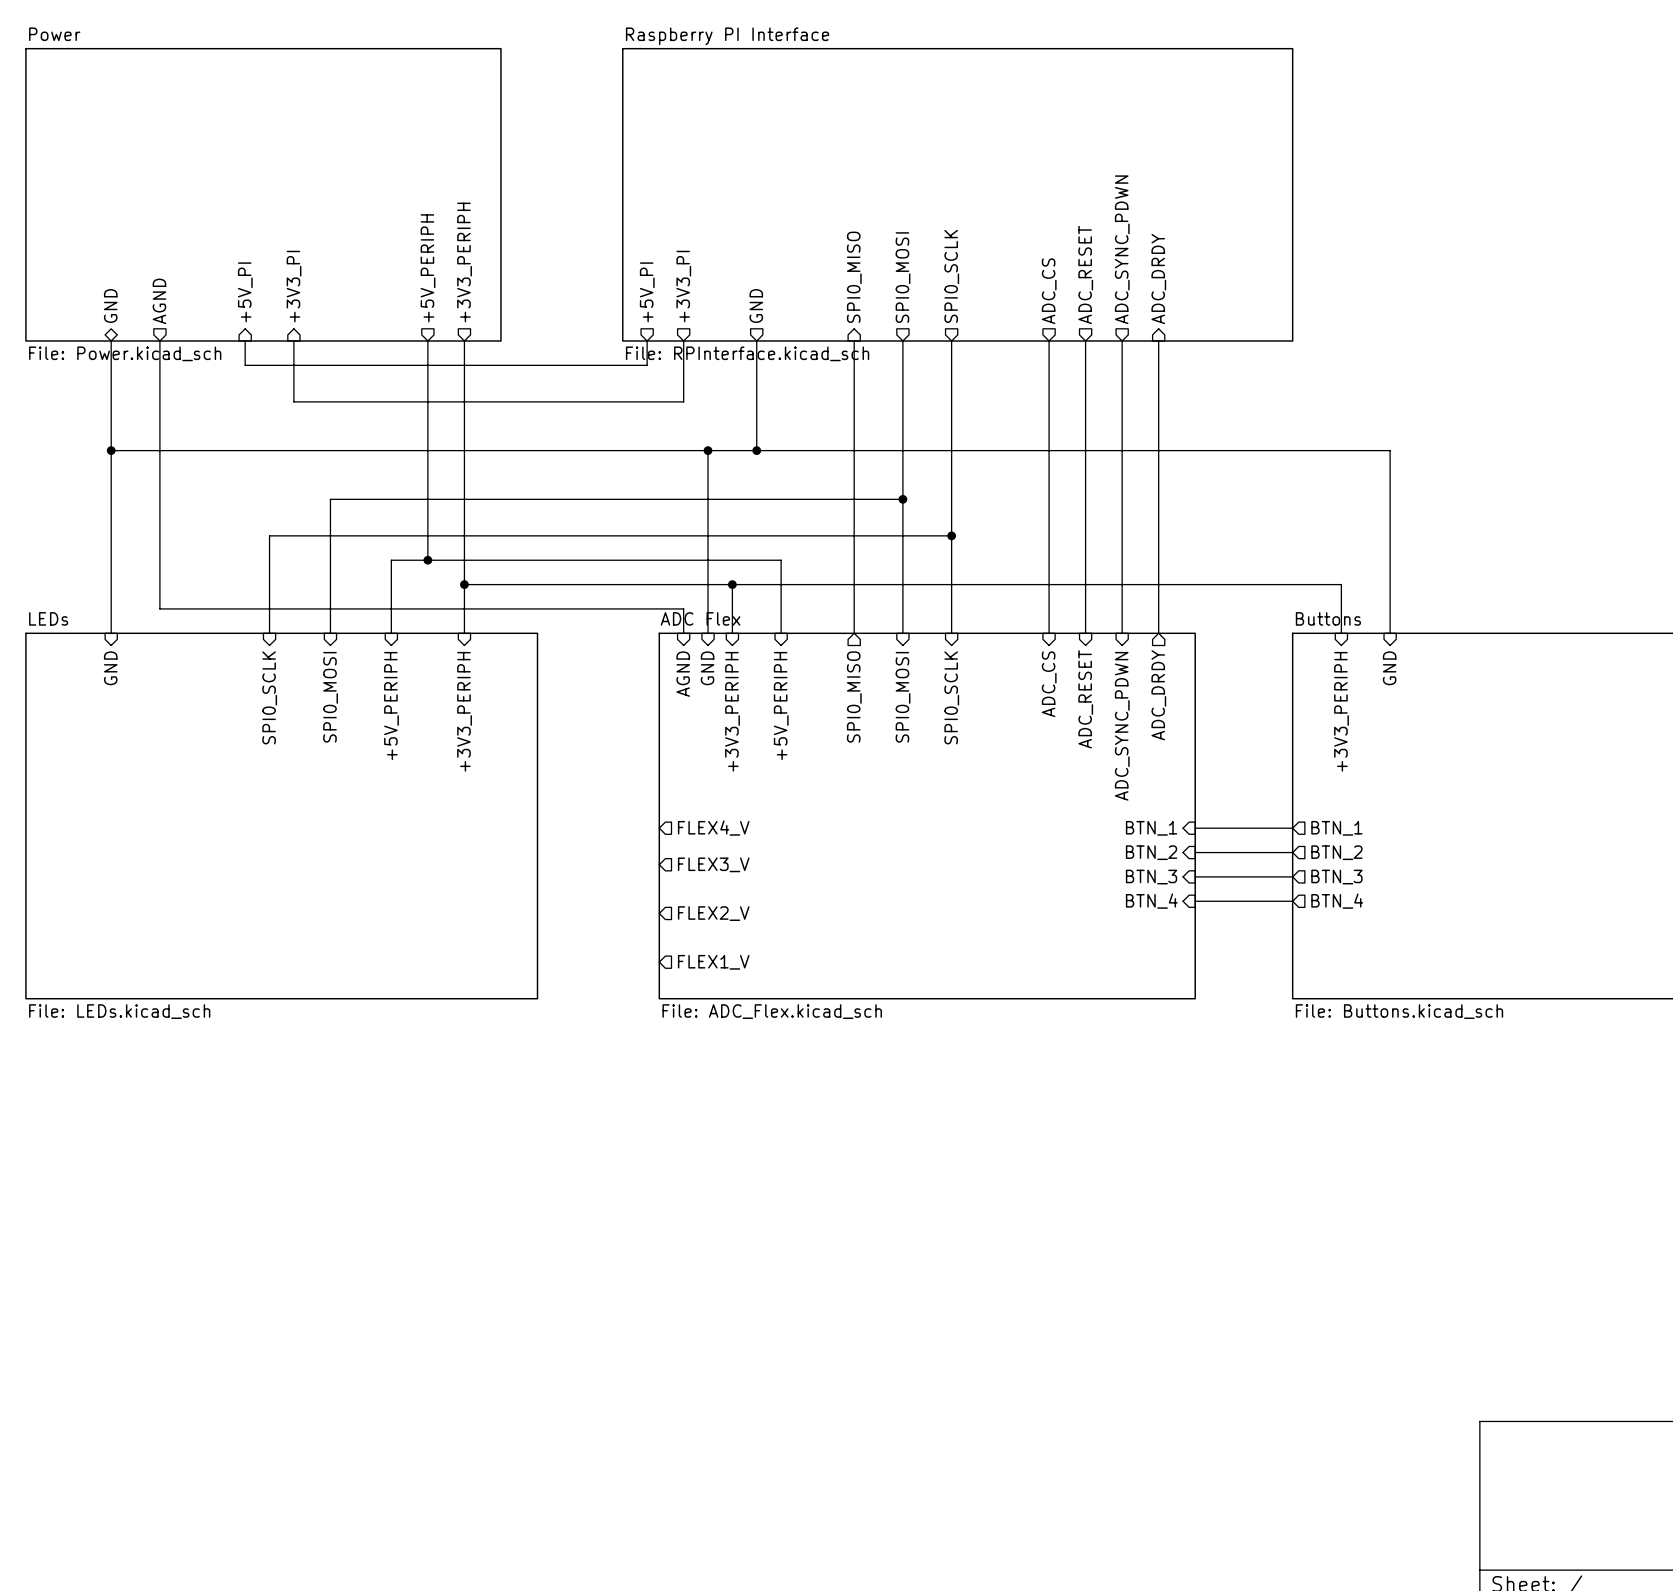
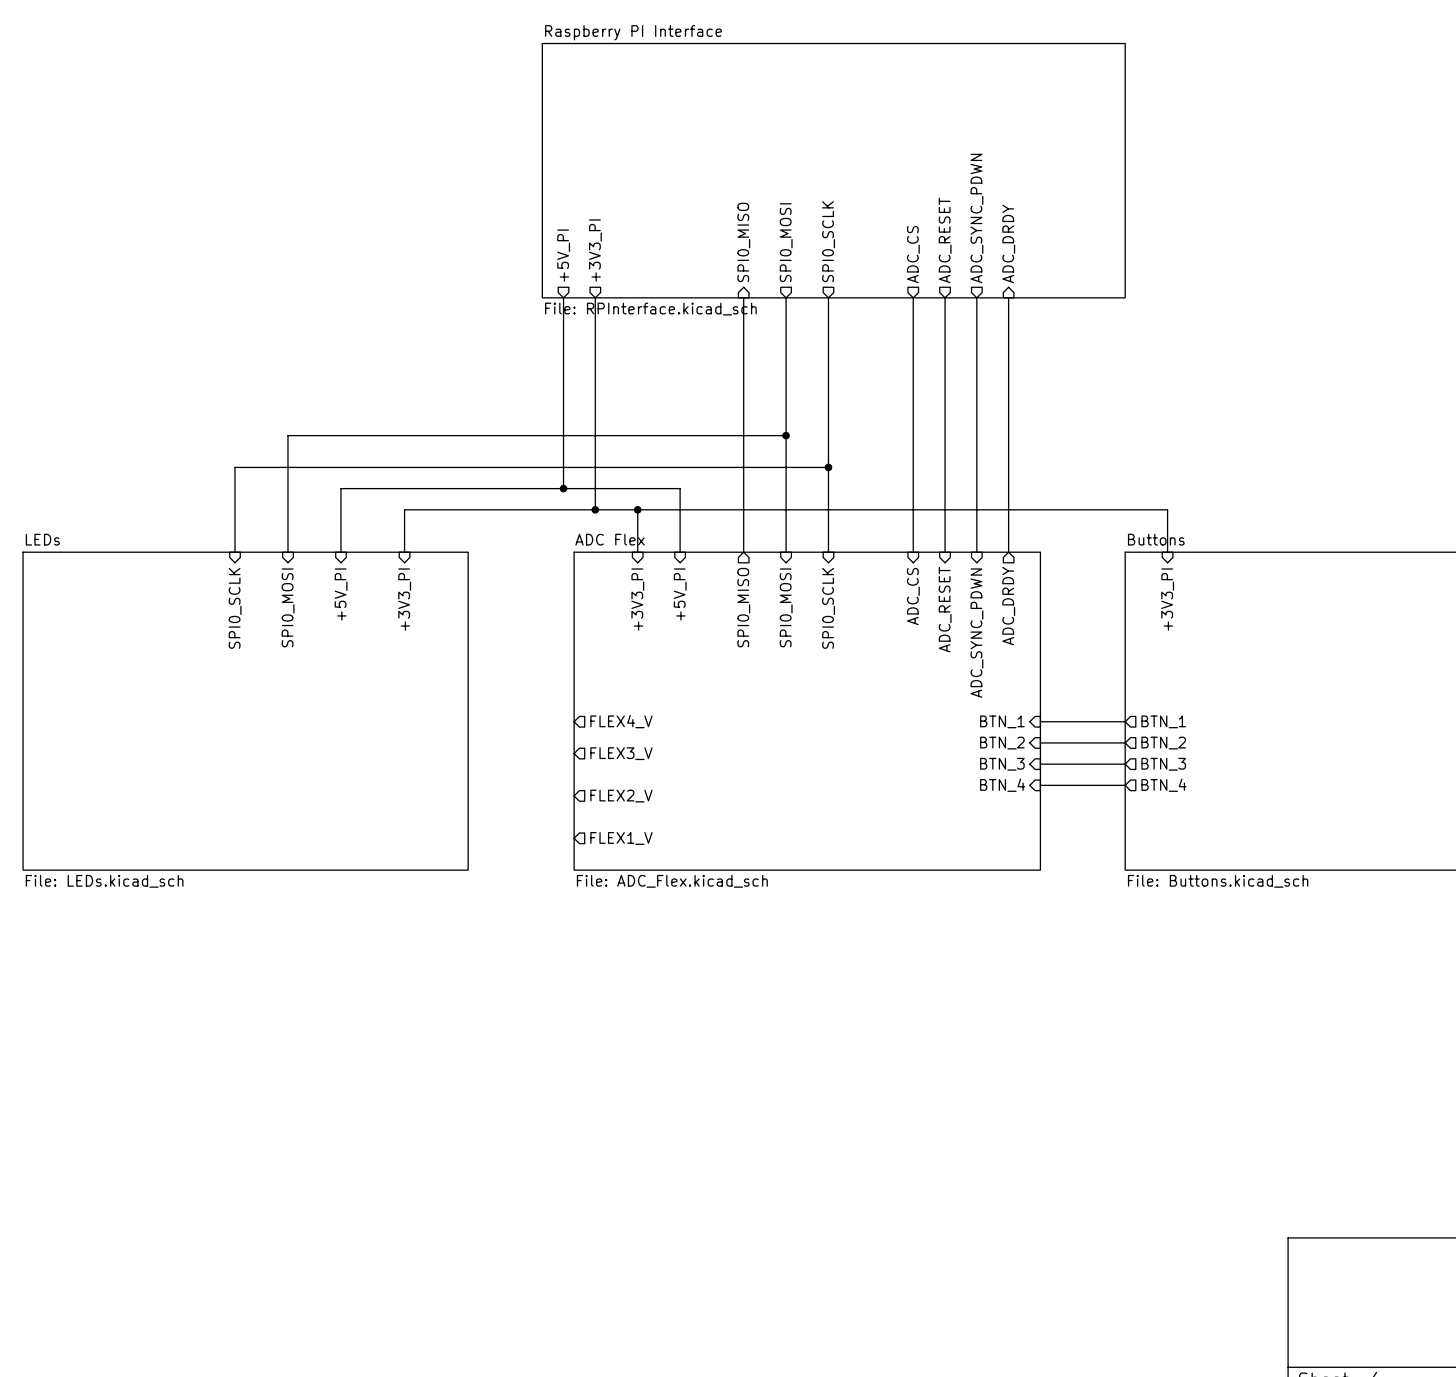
sheet Power: File: Power.kicad_sch (263, 194) -> none
sheet pin: +3V3_PERIPH (464, 262) -> none
sheet pin: +5V_PERIPH (428, 268) -> none
sheet pin: +3V3_PI (294, 286) -> none
sheet pin: +5V_PI (245, 292) -> none
sheet pin: AGND (159, 301) -> none
sheet pin: GND (110, 306) -> none
sheet pin: GND (756, 306) -> none
wire: (111, 340) (111, 633) -> none
wire: (159, 340) (159, 608) (683, 608) (683, 633) -> none
wire: (245, 340) (245, 365) (647, 365) -> (563, 488) (563, 319)
wire: (293, 340) (293, 401) (683, 401) -> (595, 509) (595, 350)
wire: (427, 340) (427, 560) -> none
wire: (464, 340) (464, 584) -> none
wire: (756, 340) (756, 450) -> none
wire: (111, 450) (1390, 450) (1390, 633) -> none
junction: (111, 450) -> none
wire: (708, 450) (708, 633) -> none
junction: (708, 450) -> none
junction: (756, 450) -> none
junction: (427, 560) -> none
junction: none -> (563, 488)
junction: (464, 584) -> none
junction: none -> (595, 509)
sheet pin: GND (110, 668) -> none
sheet pin: GND (707, 668) -> none
sheet pin: GND (1389, 668) -> none
sheet pin: AGND (683, 674) -> none
sheet pin: +5V_PERIPH (391, 706) -> +5V_PI (341, 594)
sheet pin: +5V_PERIPH (781, 706) -> +5V_PI (680, 594)
sheet pin: +3V3_PERIPH (464, 711) -> +3V3_PI (404, 599)
sheet pin: +3V3_PERIPH (732, 711) -> +3V3_PI (637, 599)
sheet pin: +3V3_PERIPH (1341, 711) -> +3V3_PI (1167, 599)

